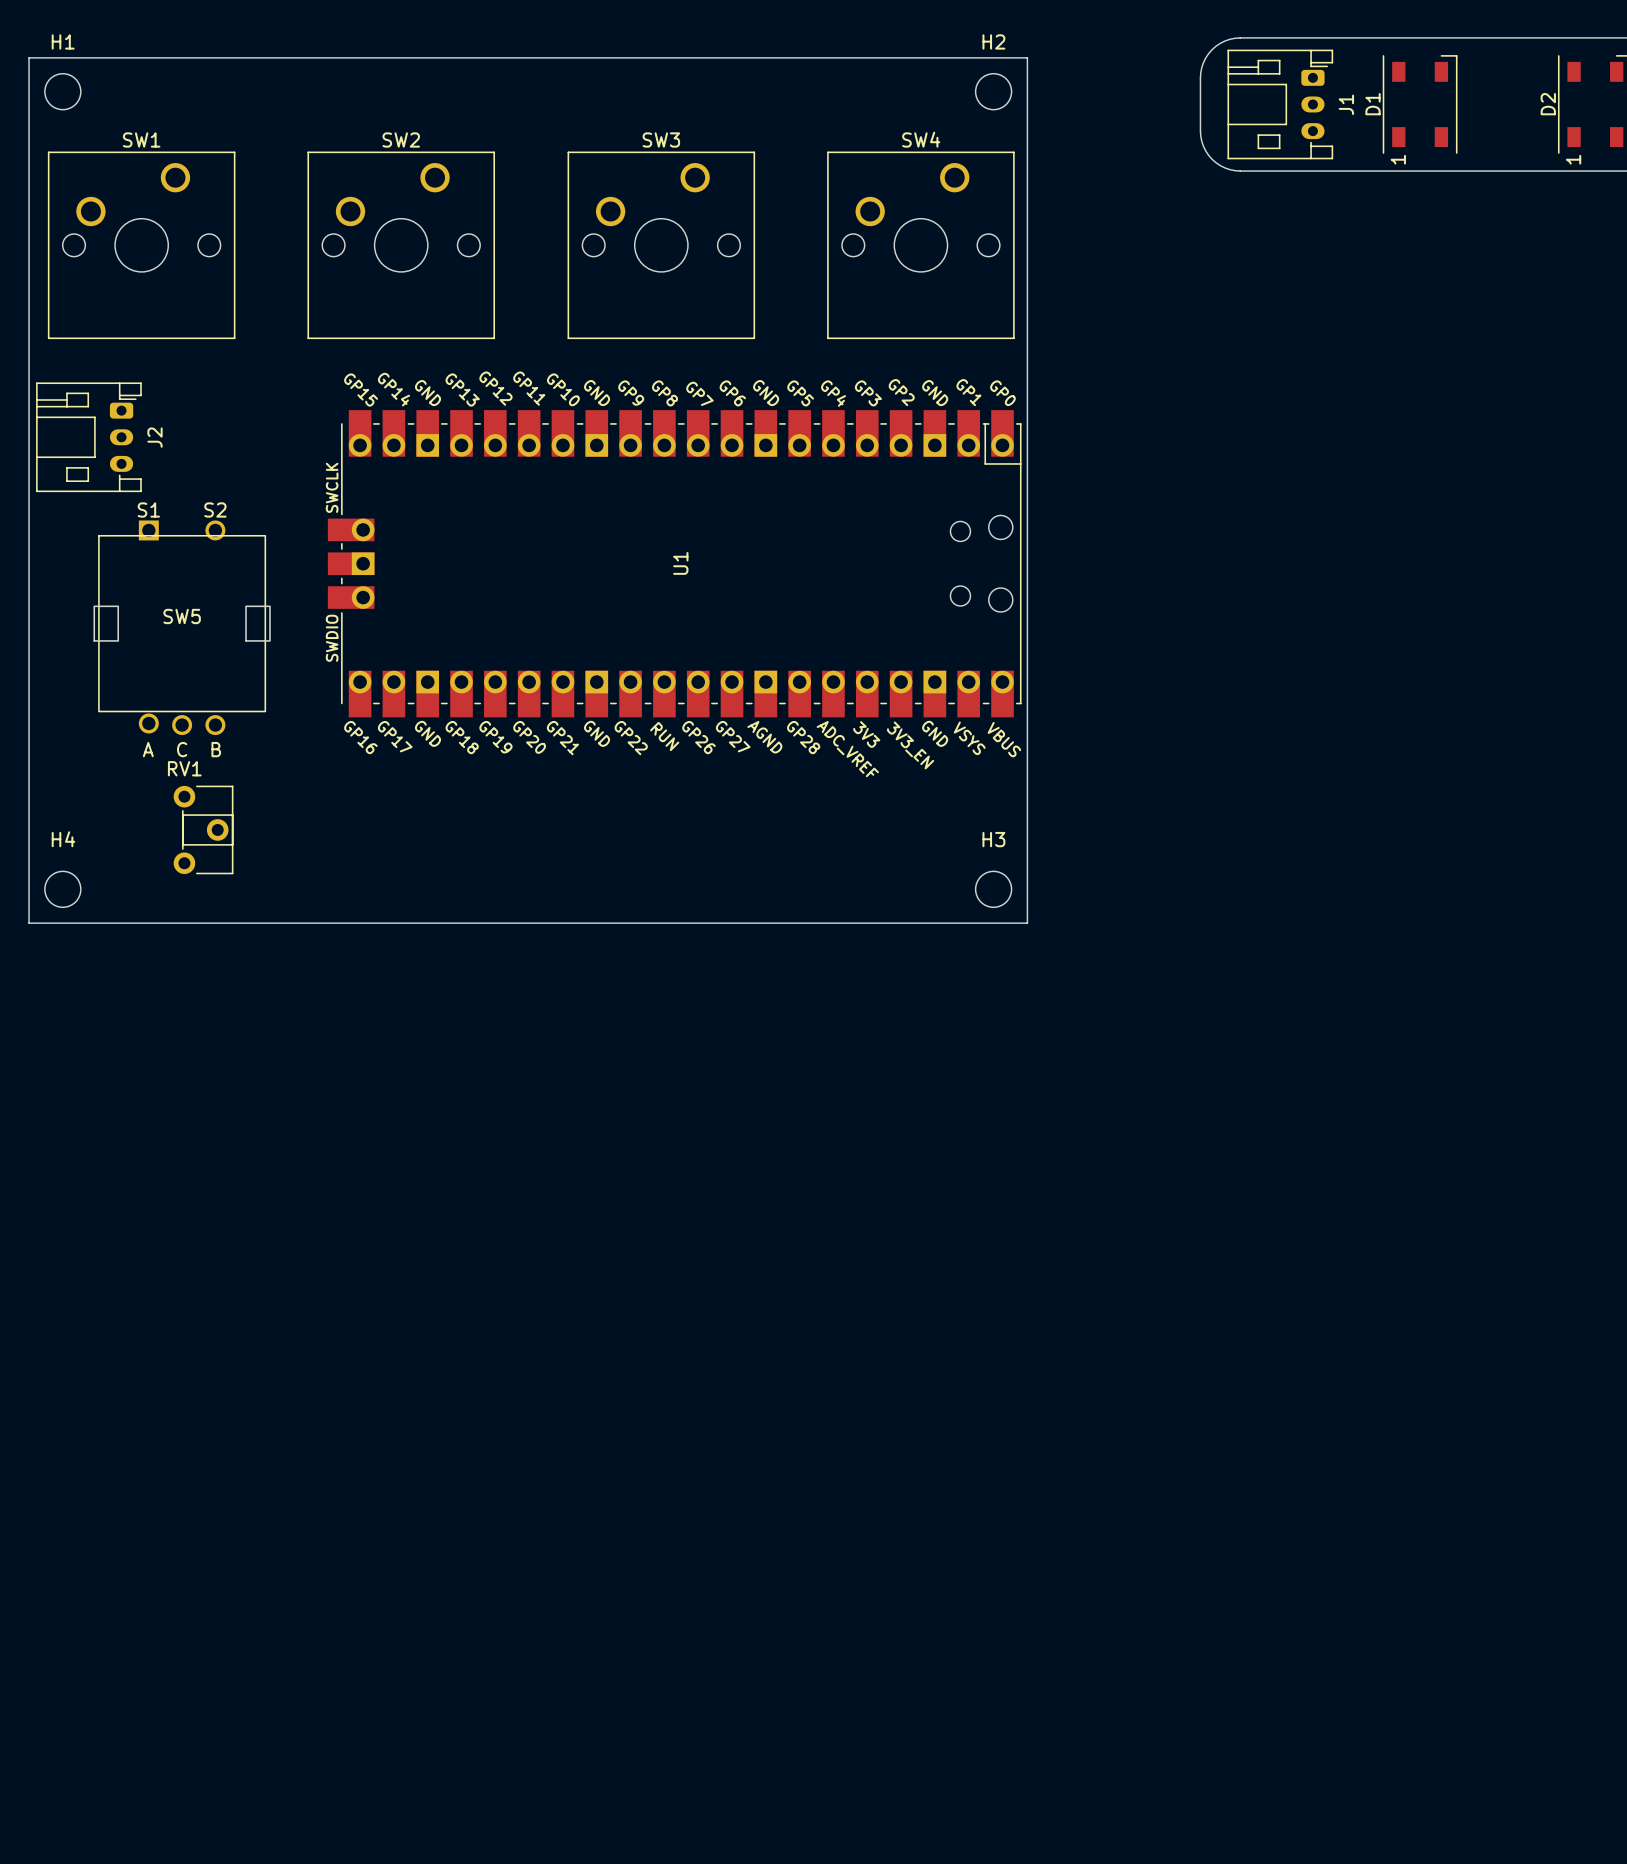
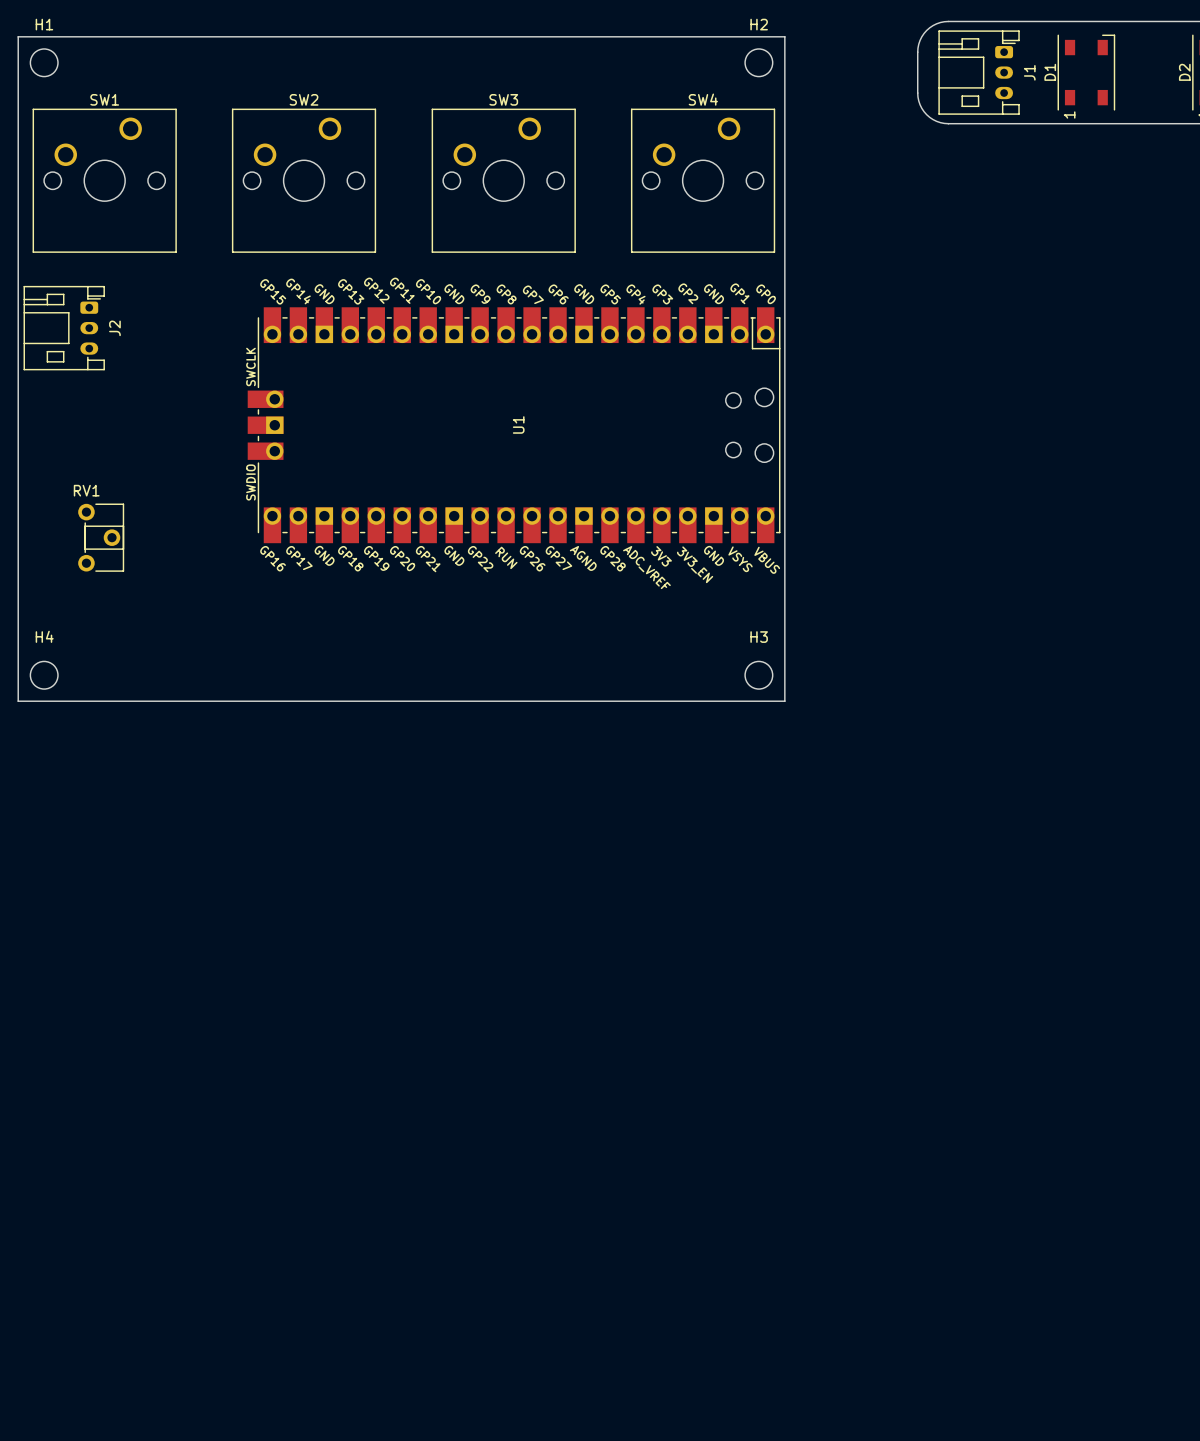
SW5: (182, 627) -> none
RV1 position: (203, 829) -> (101, 537)

